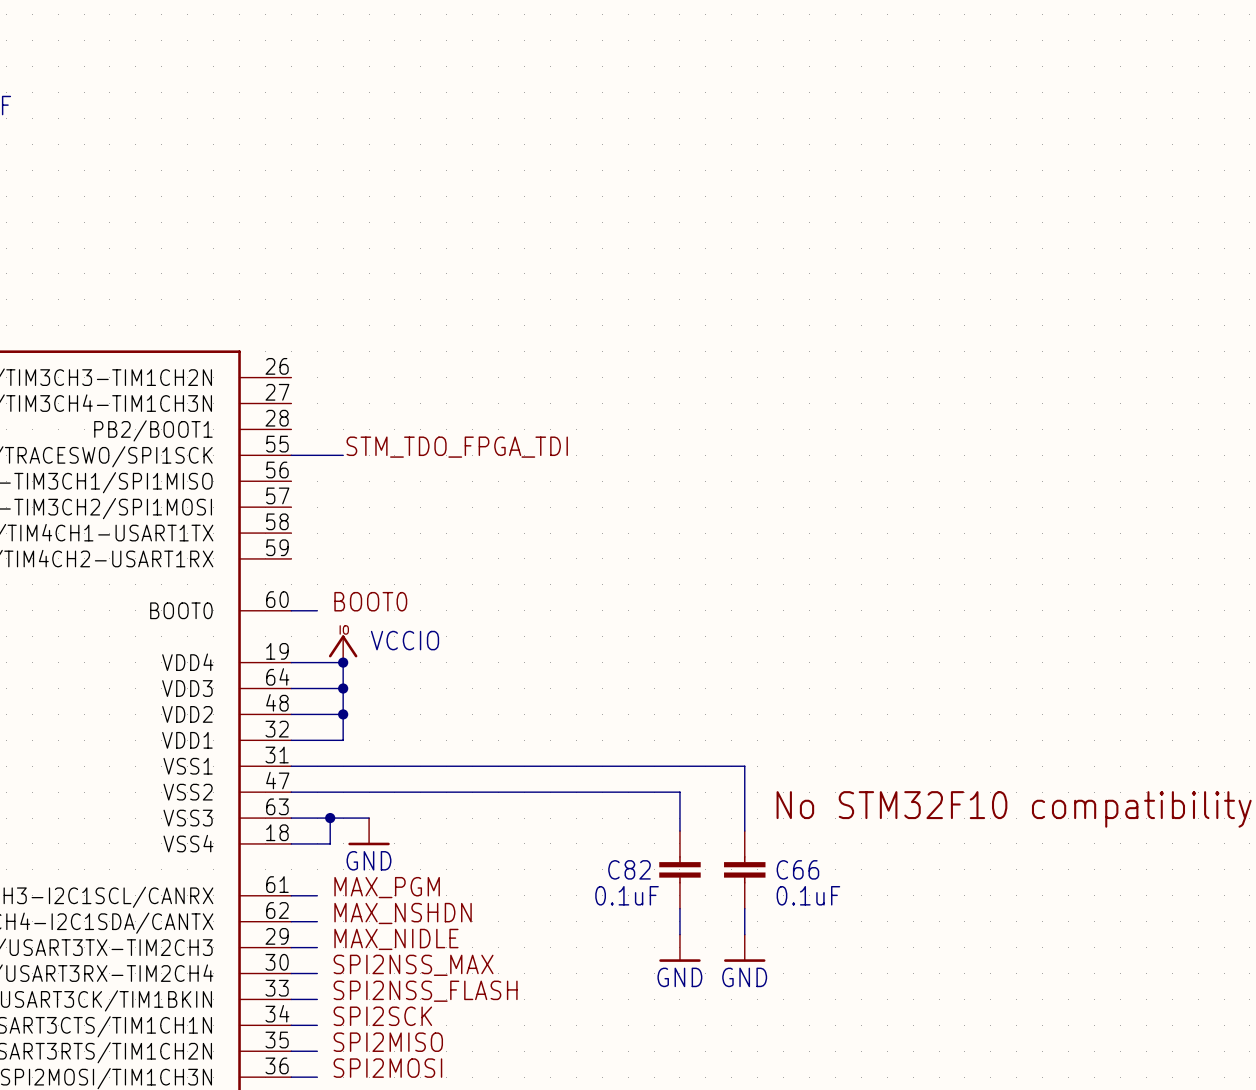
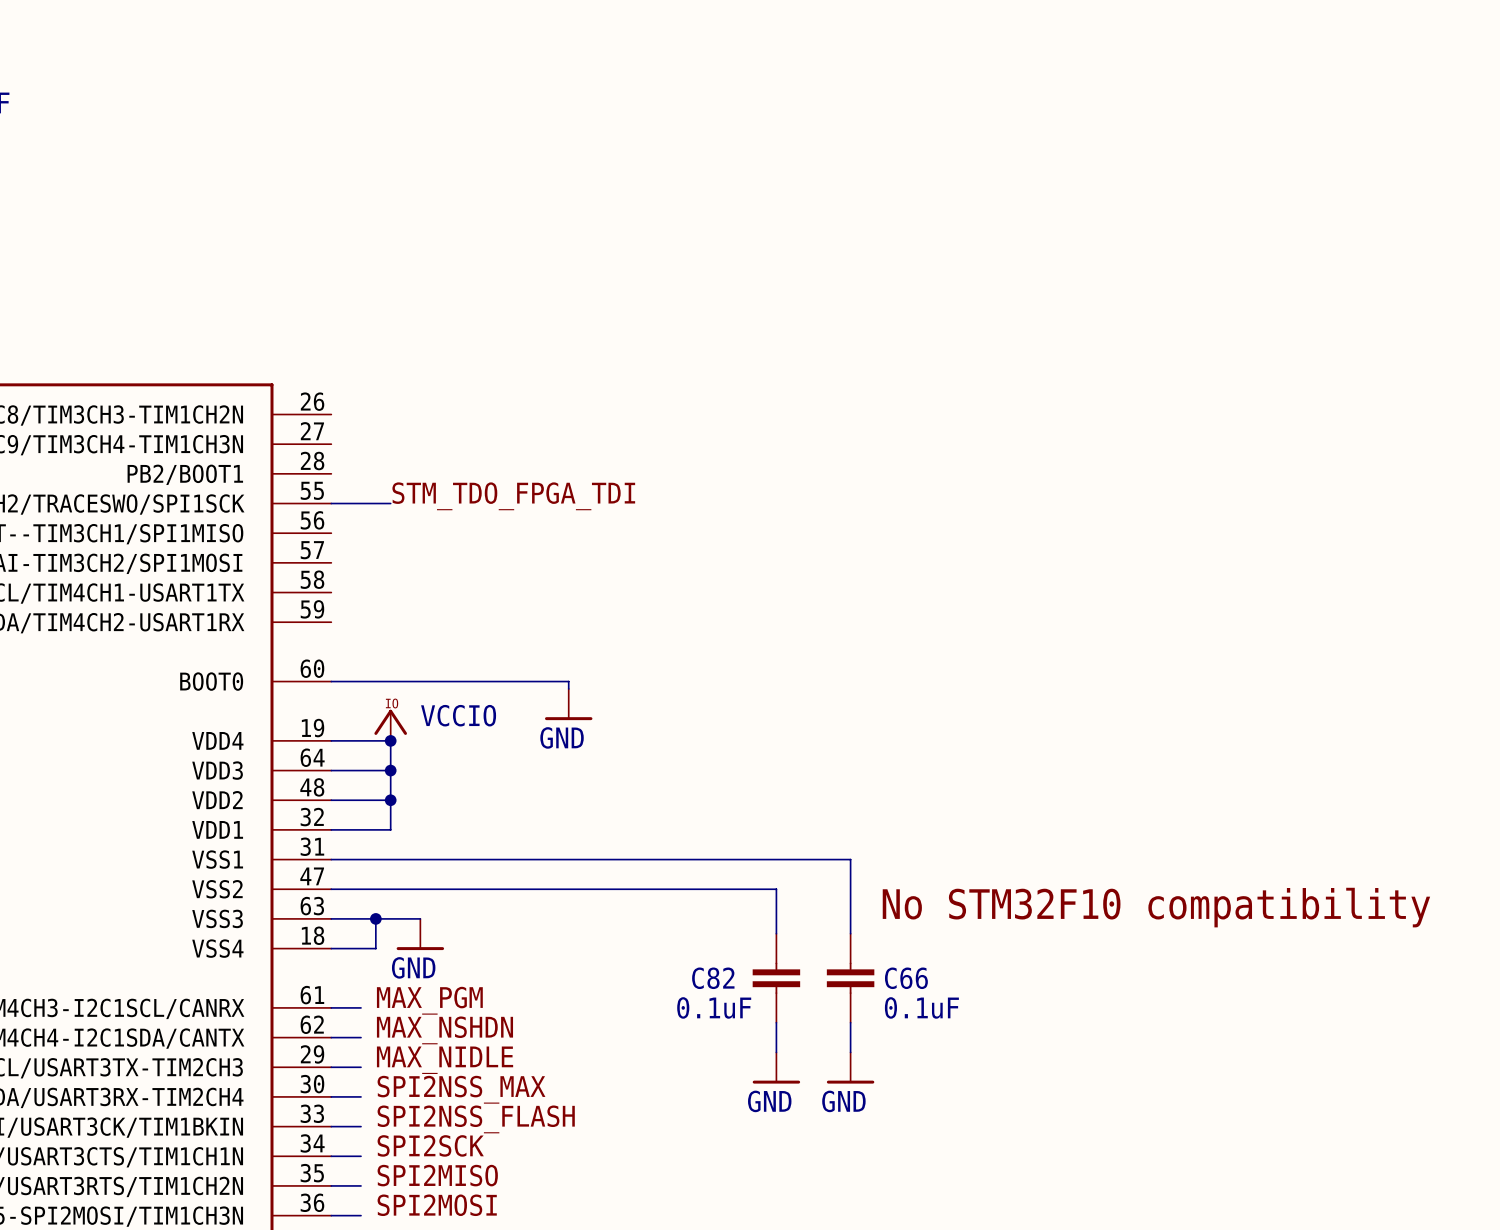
label: BOOT0 (370, 601) -> none
wire: none -> (361, 681) (568, 681) (568, 688)
power symbol: none -> GND (568, 704)

